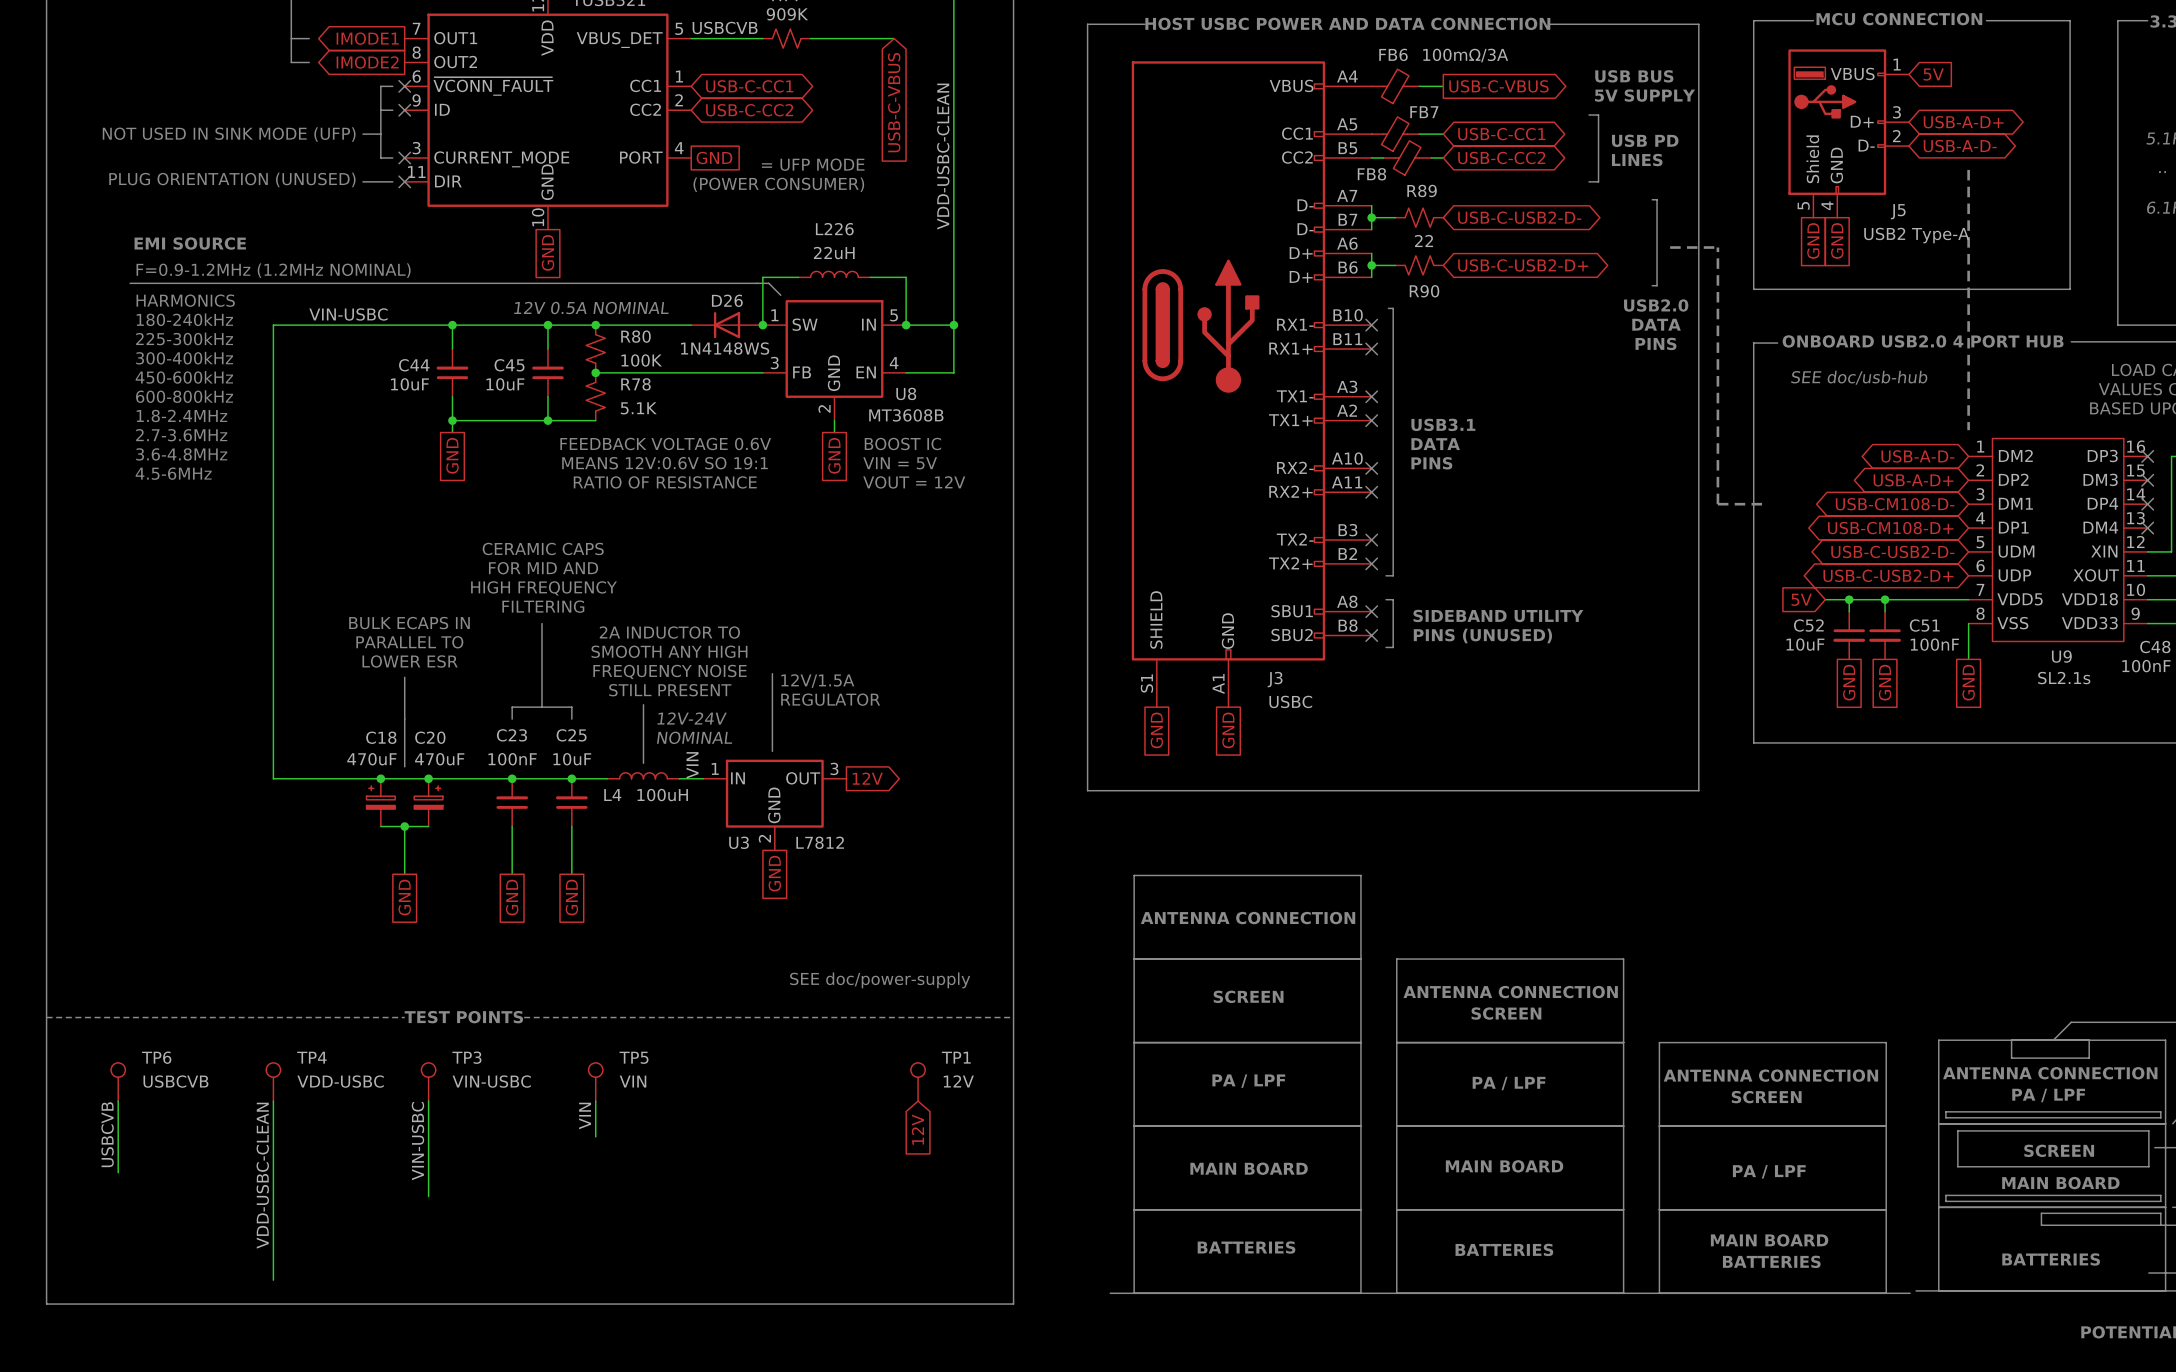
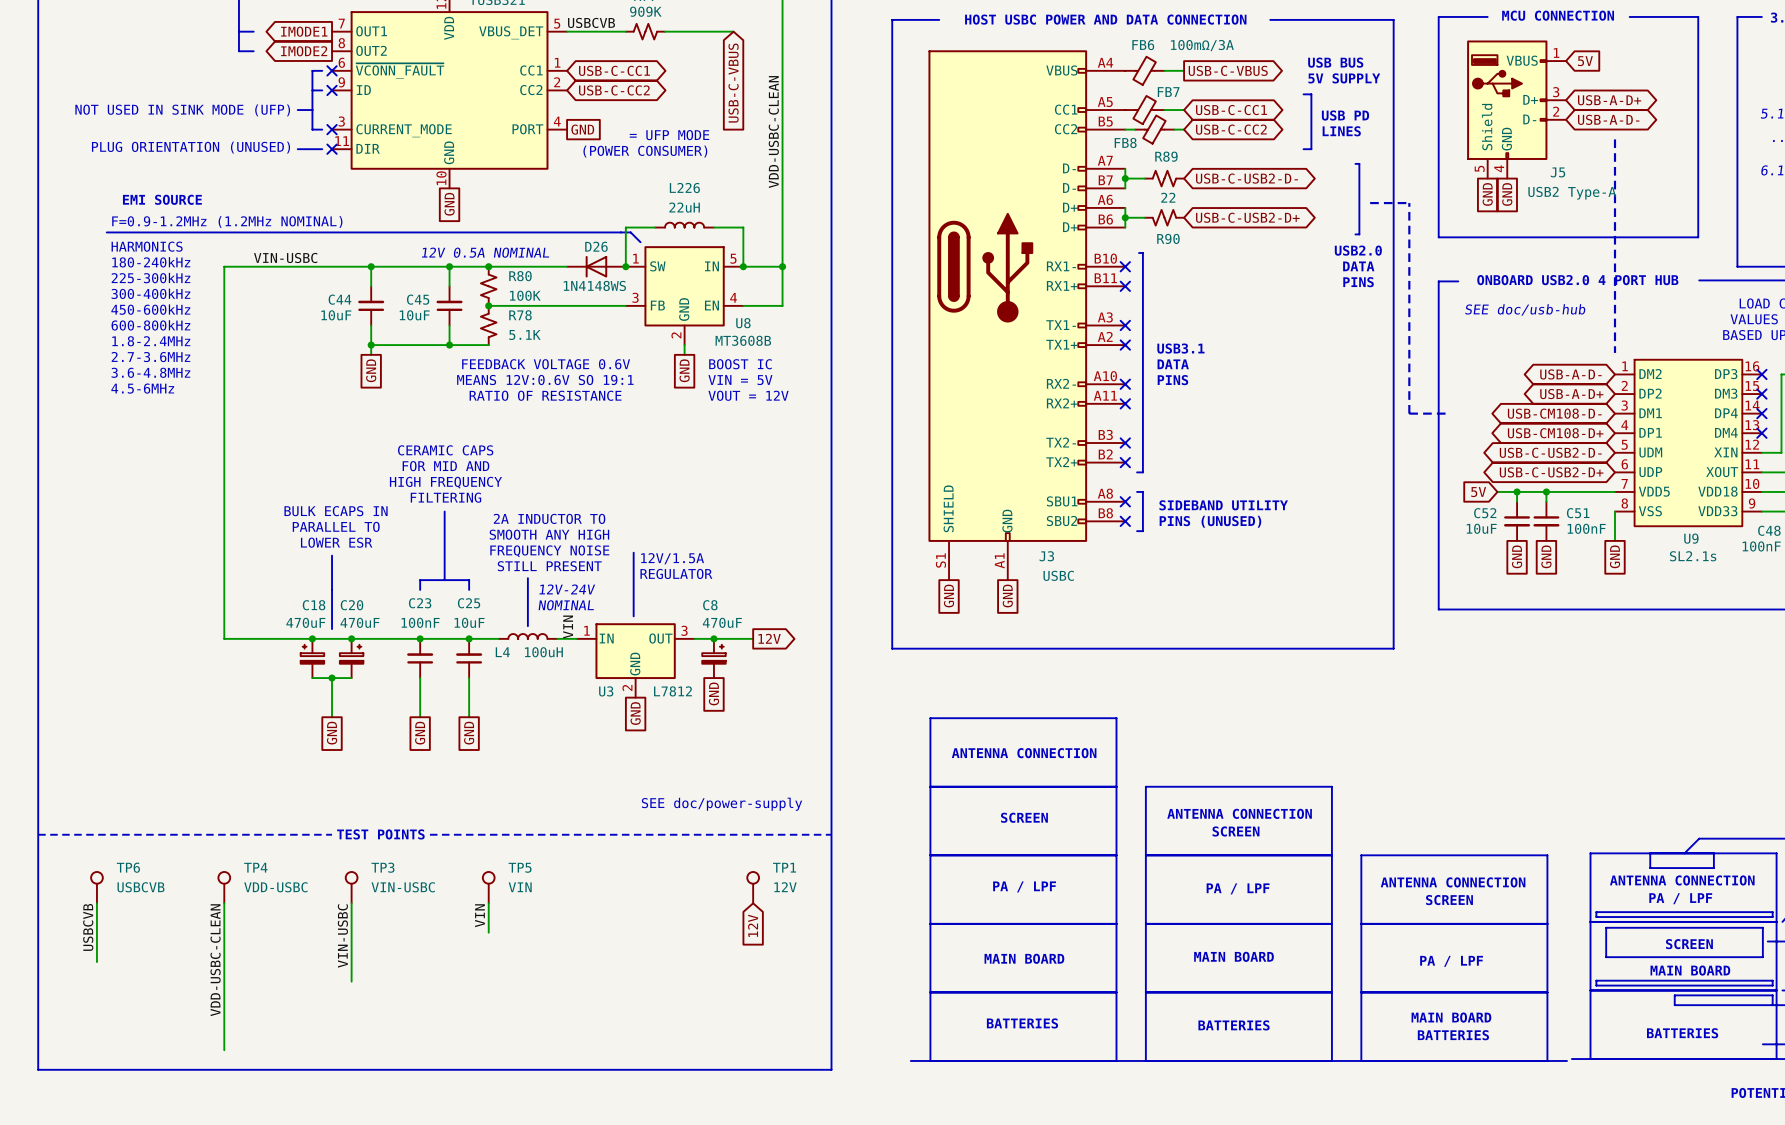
wire: none -> (694, 638) (753, 638)
global label position: 12V (867, 778) -> 12V (769, 638)
junction: none -> (713, 638)
C8: none -> 470uF (713, 658)
global label: none -> GND (713, 693)

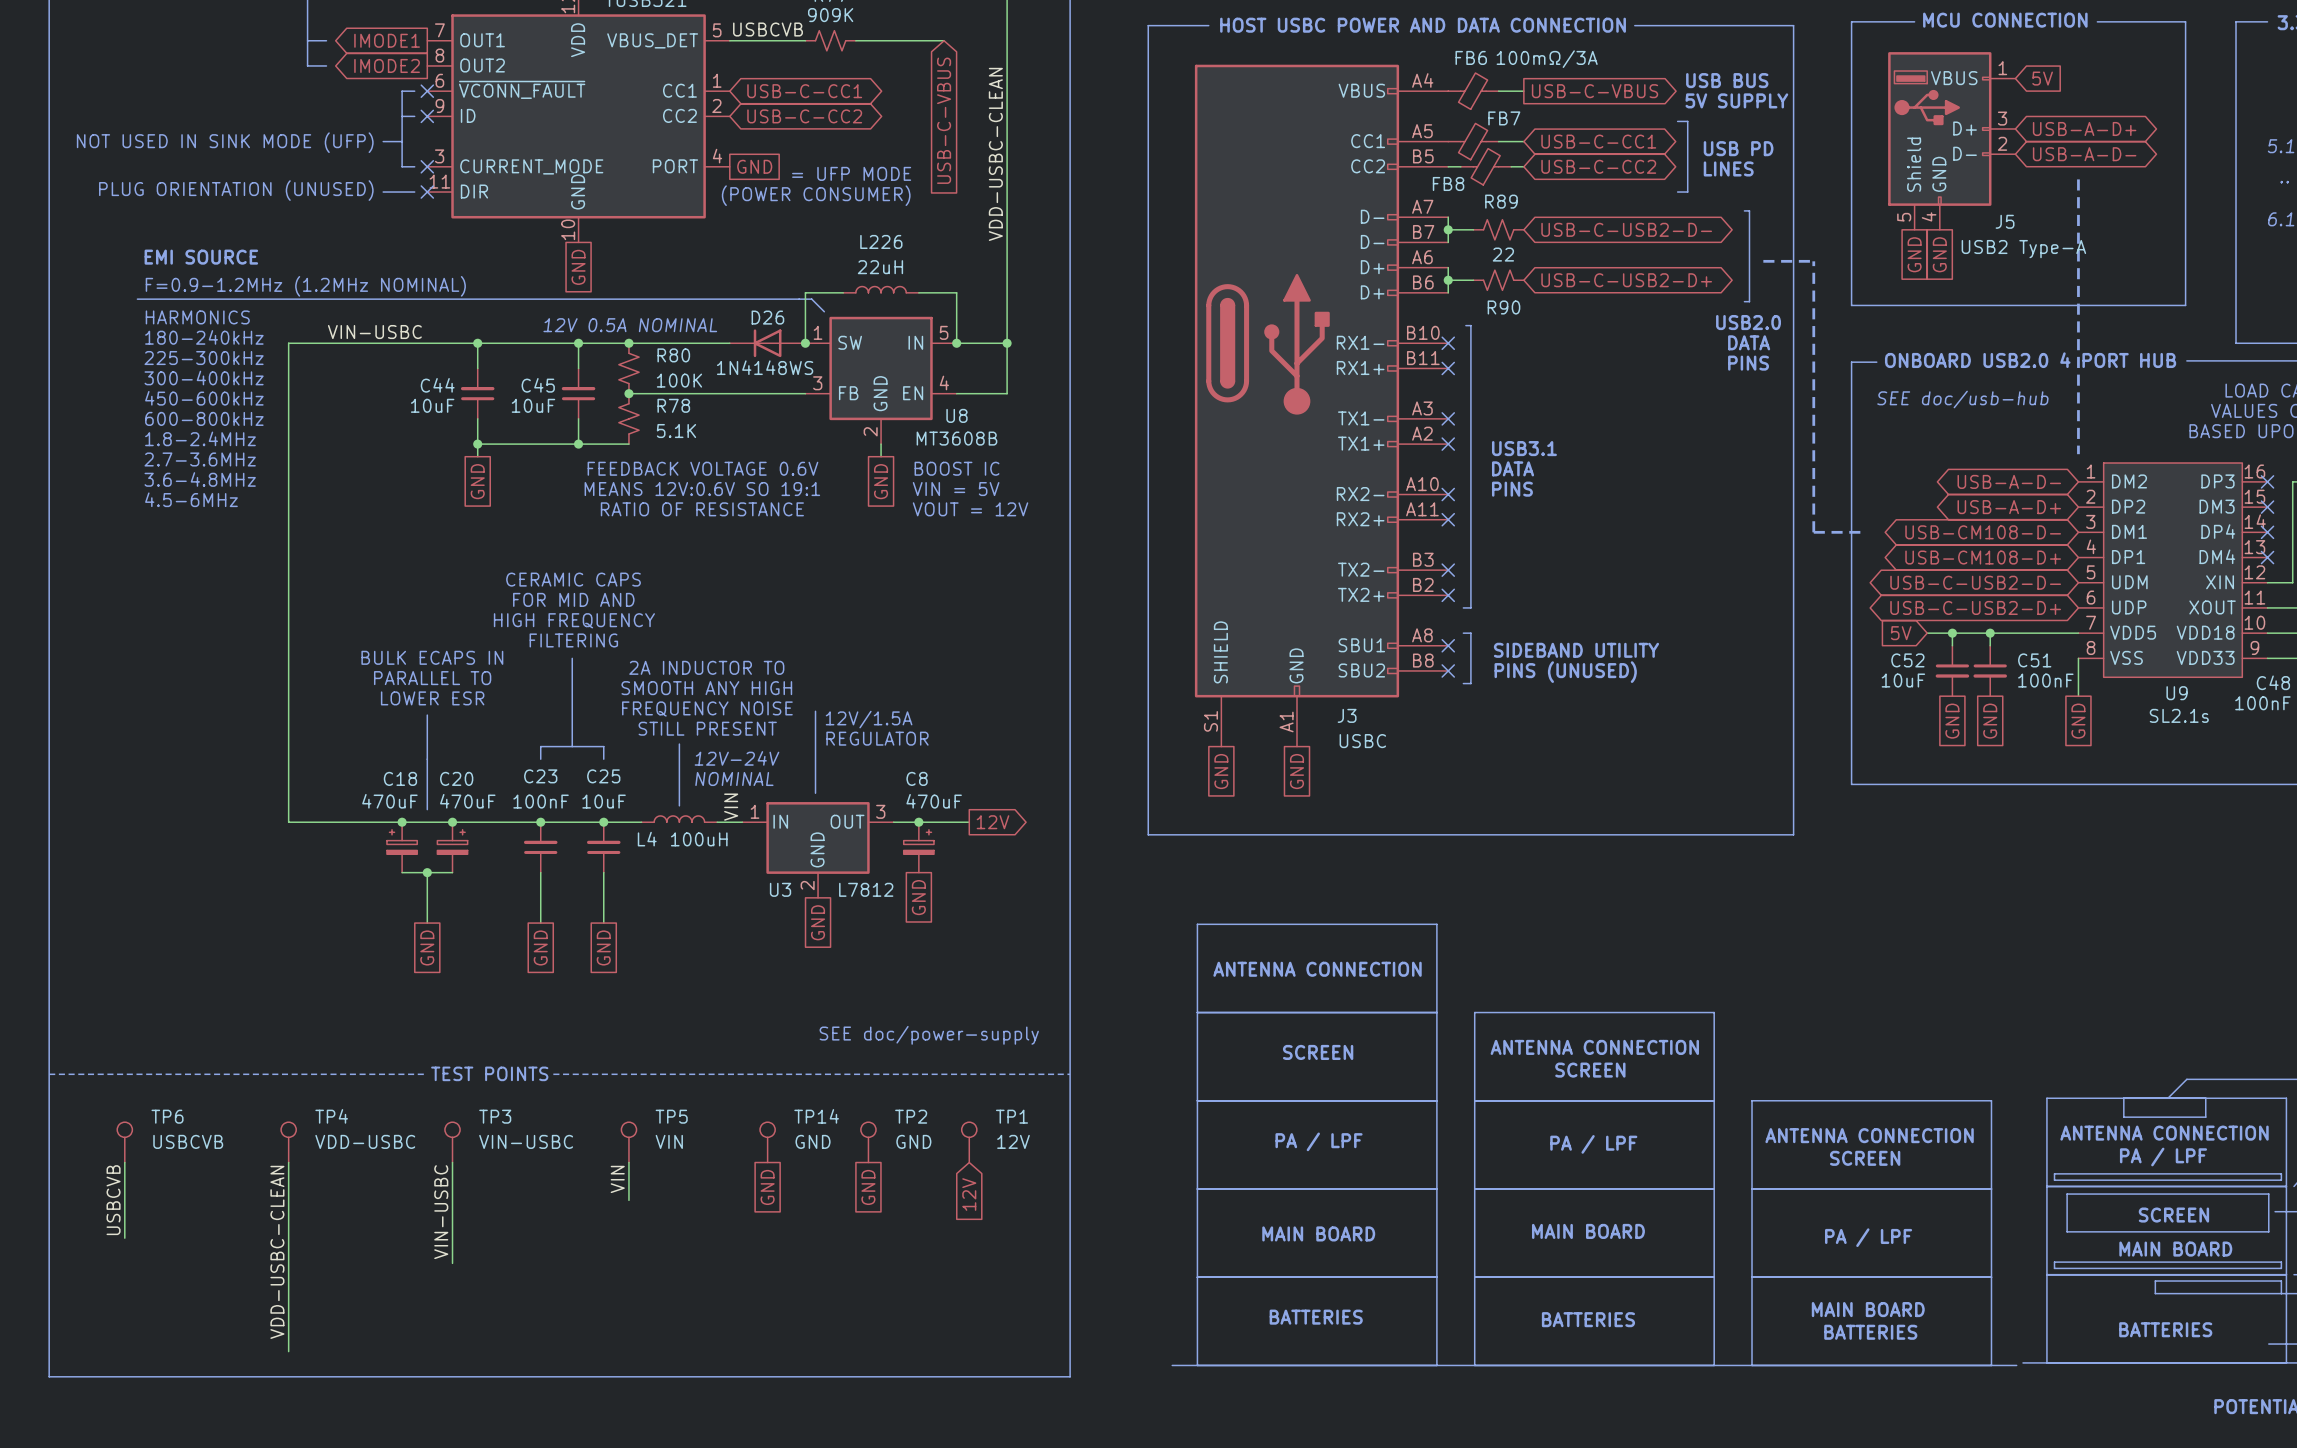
TP14: none -> GND (767, 1142)
TP2: none -> GND (868, 1142)
global label: none -> GND (767, 1187)
global label: none -> GND (868, 1187)

